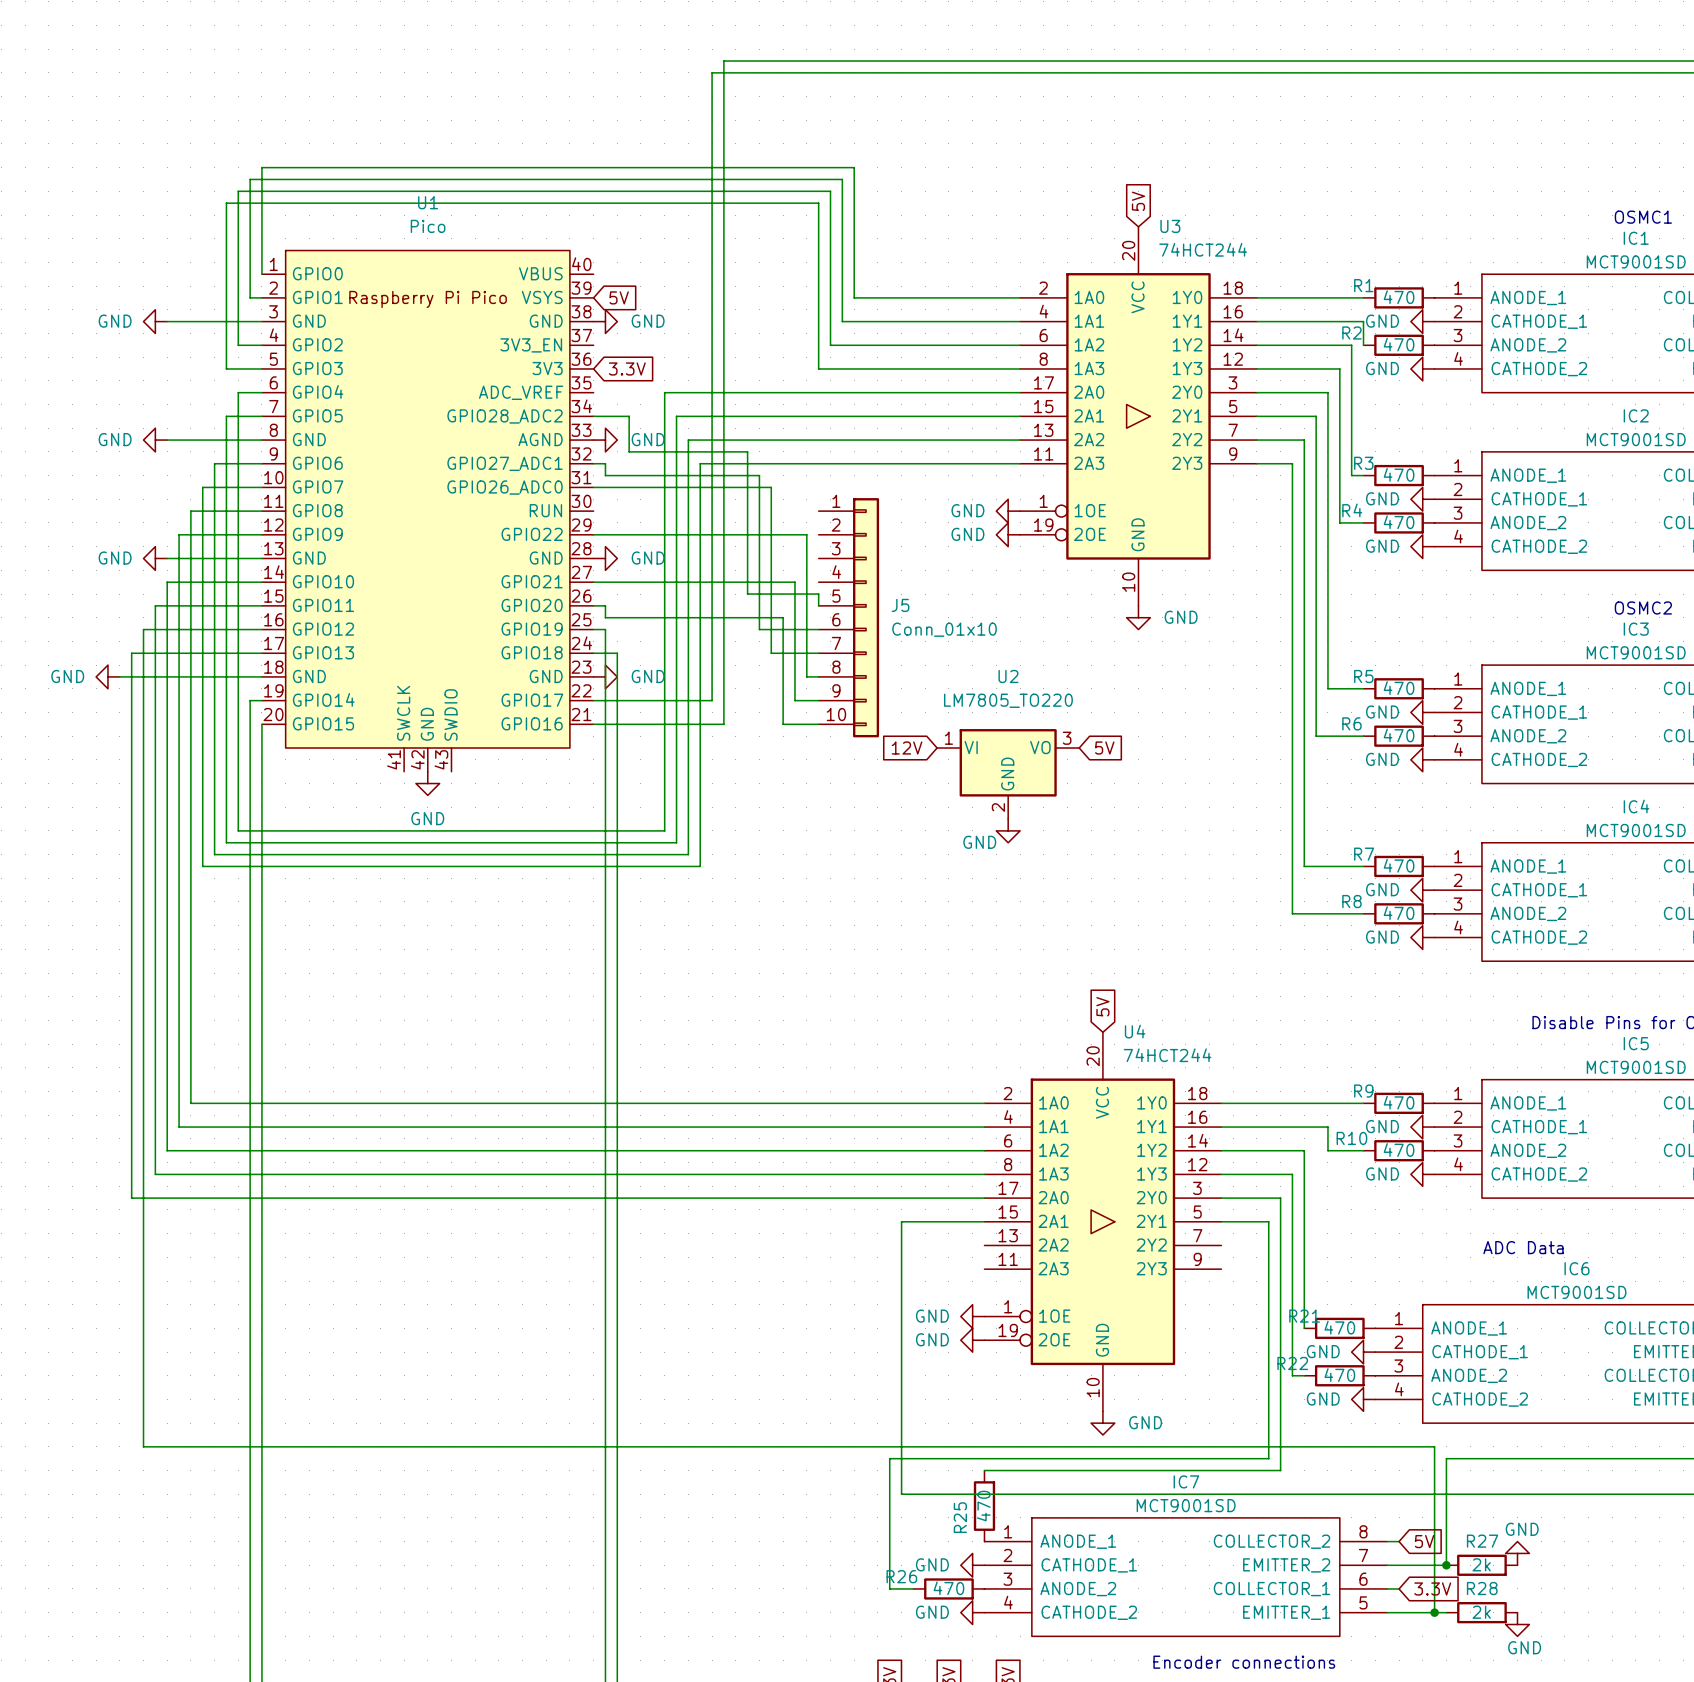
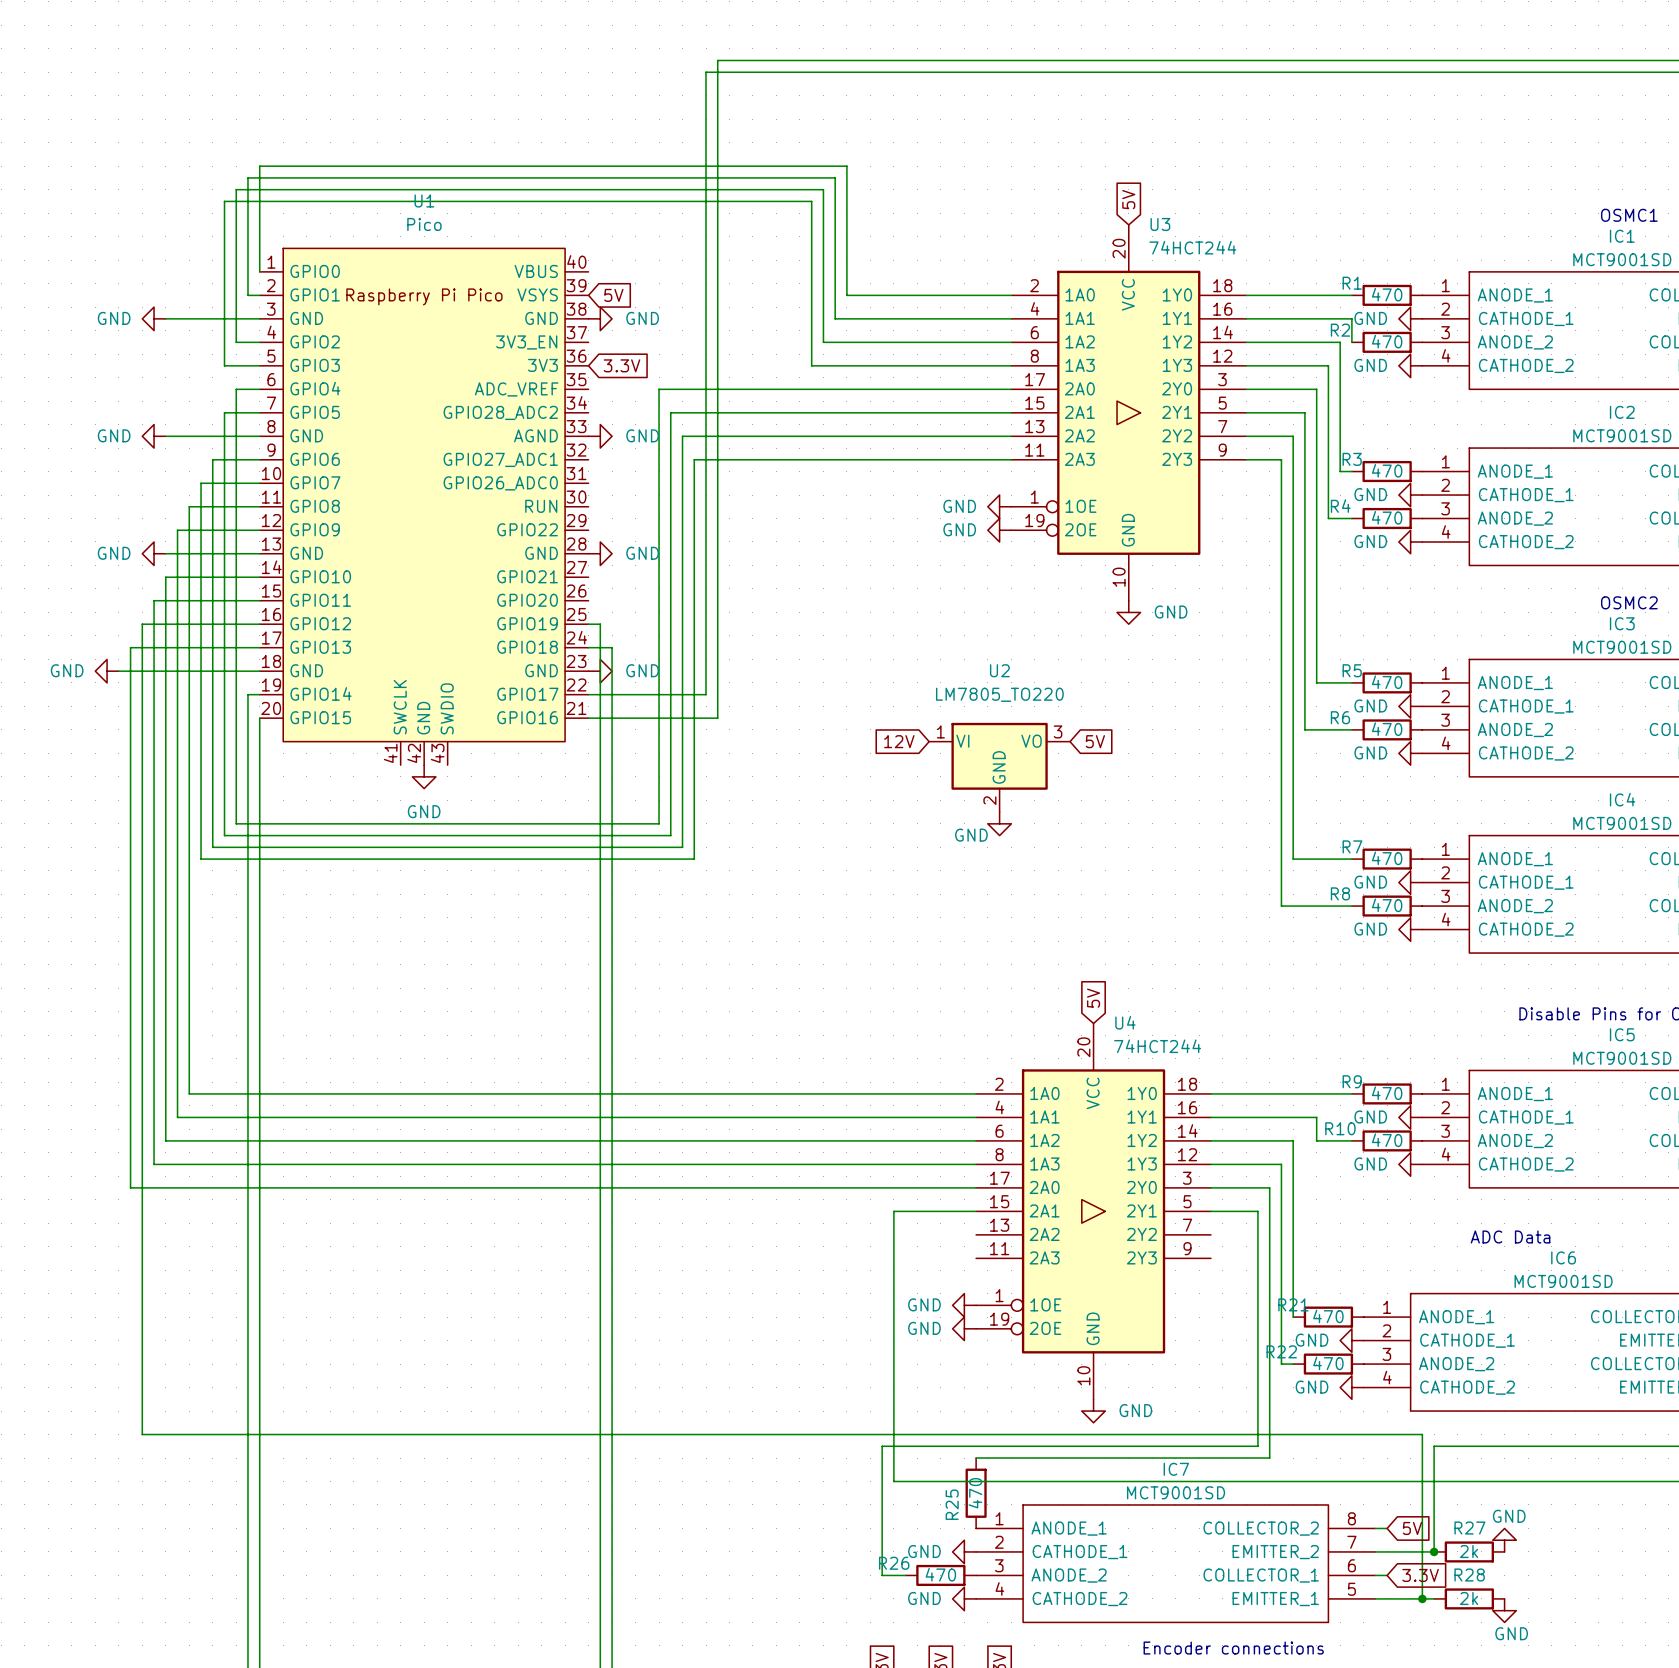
wire: (593, 416) (629, 416) (629, 451) (747, 451) (747, 594) (818, 594) (818, 605) -> none
wire: (593, 463) (605, 463) (605, 475) (759, 475) (759, 629) (818, 629) -> none
wire: (593, 487) (771, 487) (771, 653) (818, 653) -> none
wire: (593, 534) (806, 534) (806, 676) (818, 676) -> none
wire: (593, 582) (794, 582) (794, 700) (818, 700) -> none
wire: (593, 605) (605, 605) (605, 617) (783, 617) (783, 724) (818, 724) -> none
J5: Conn_01x10 (848, 617) -> none

